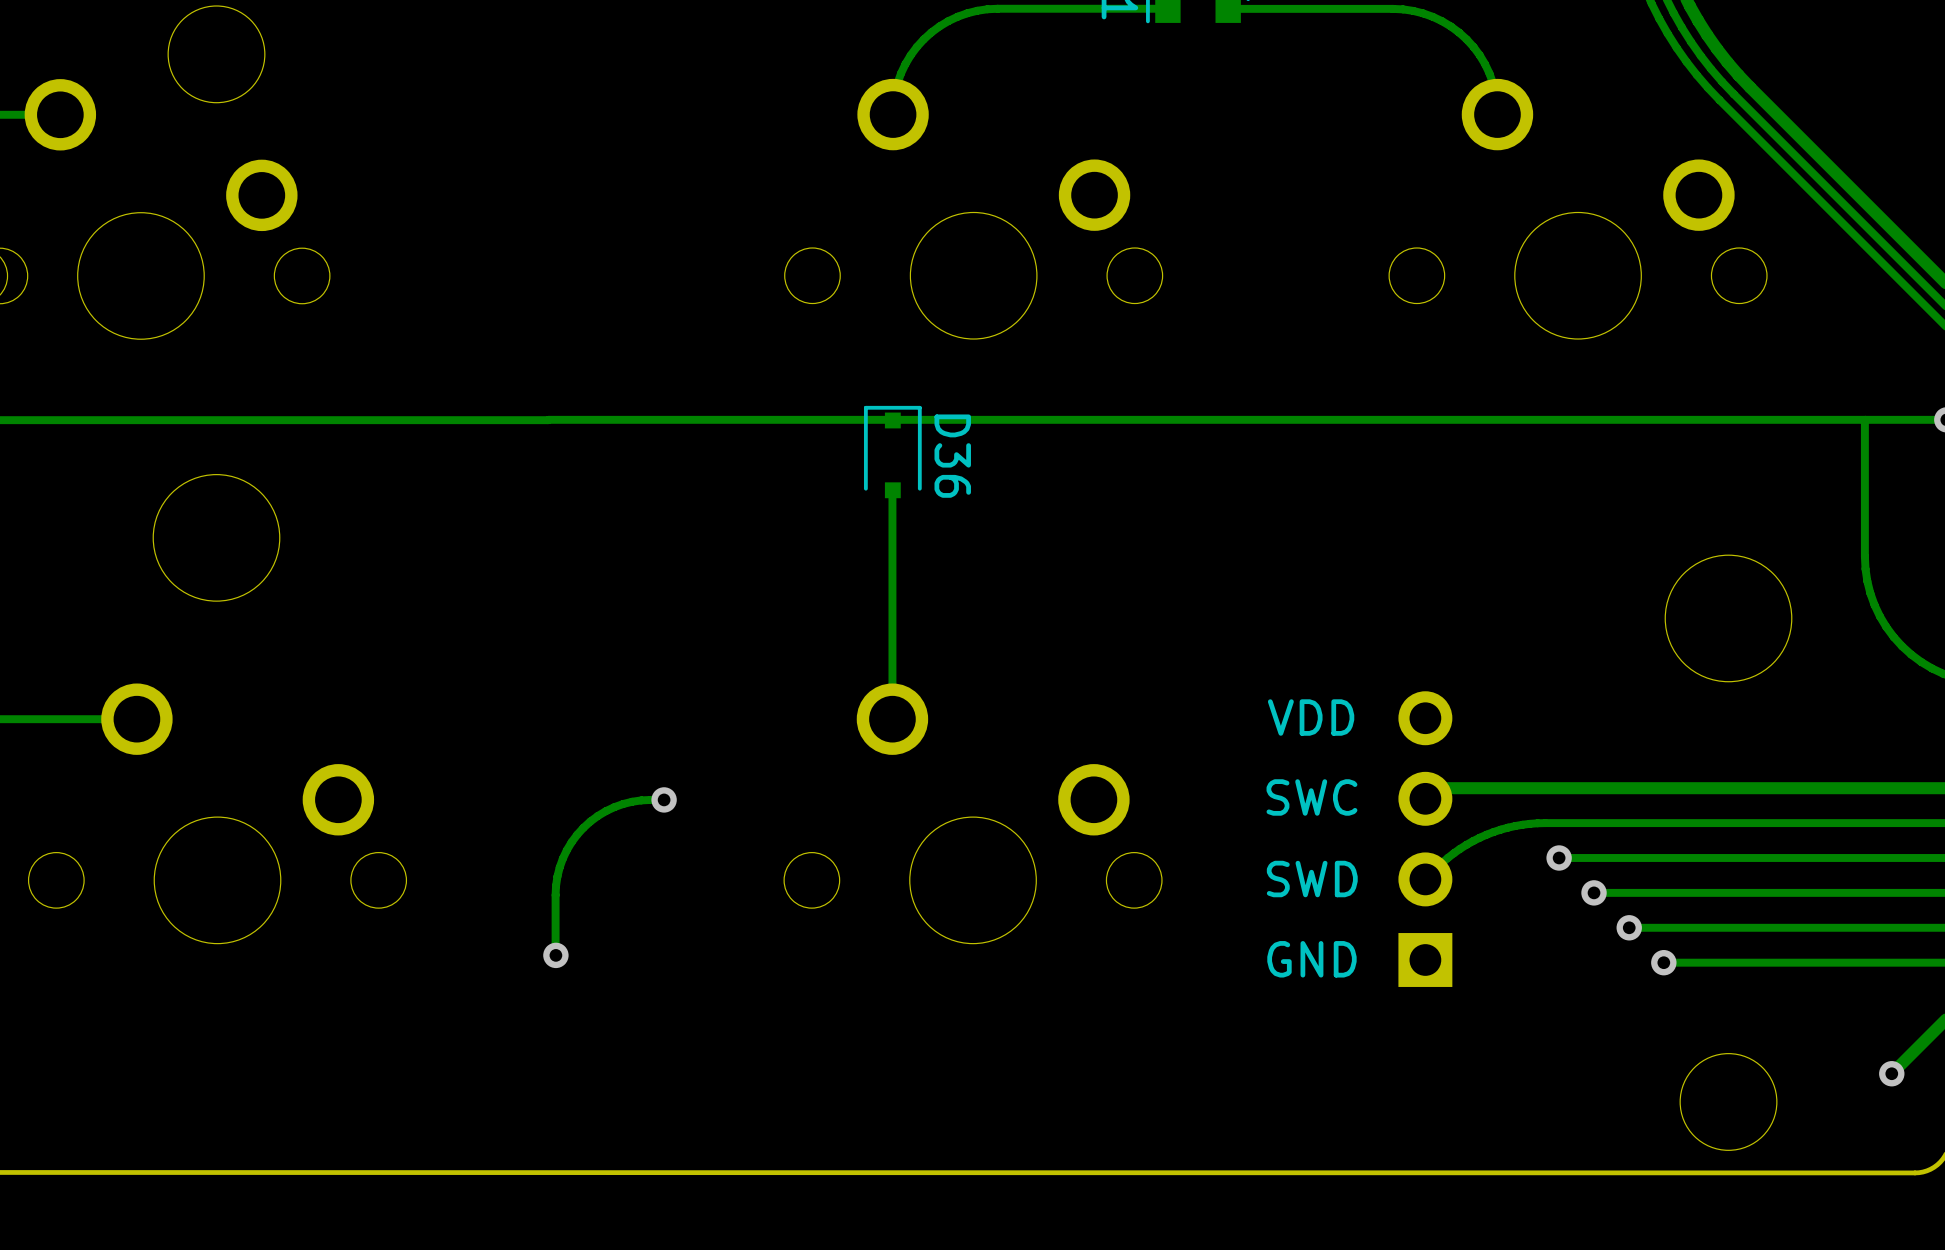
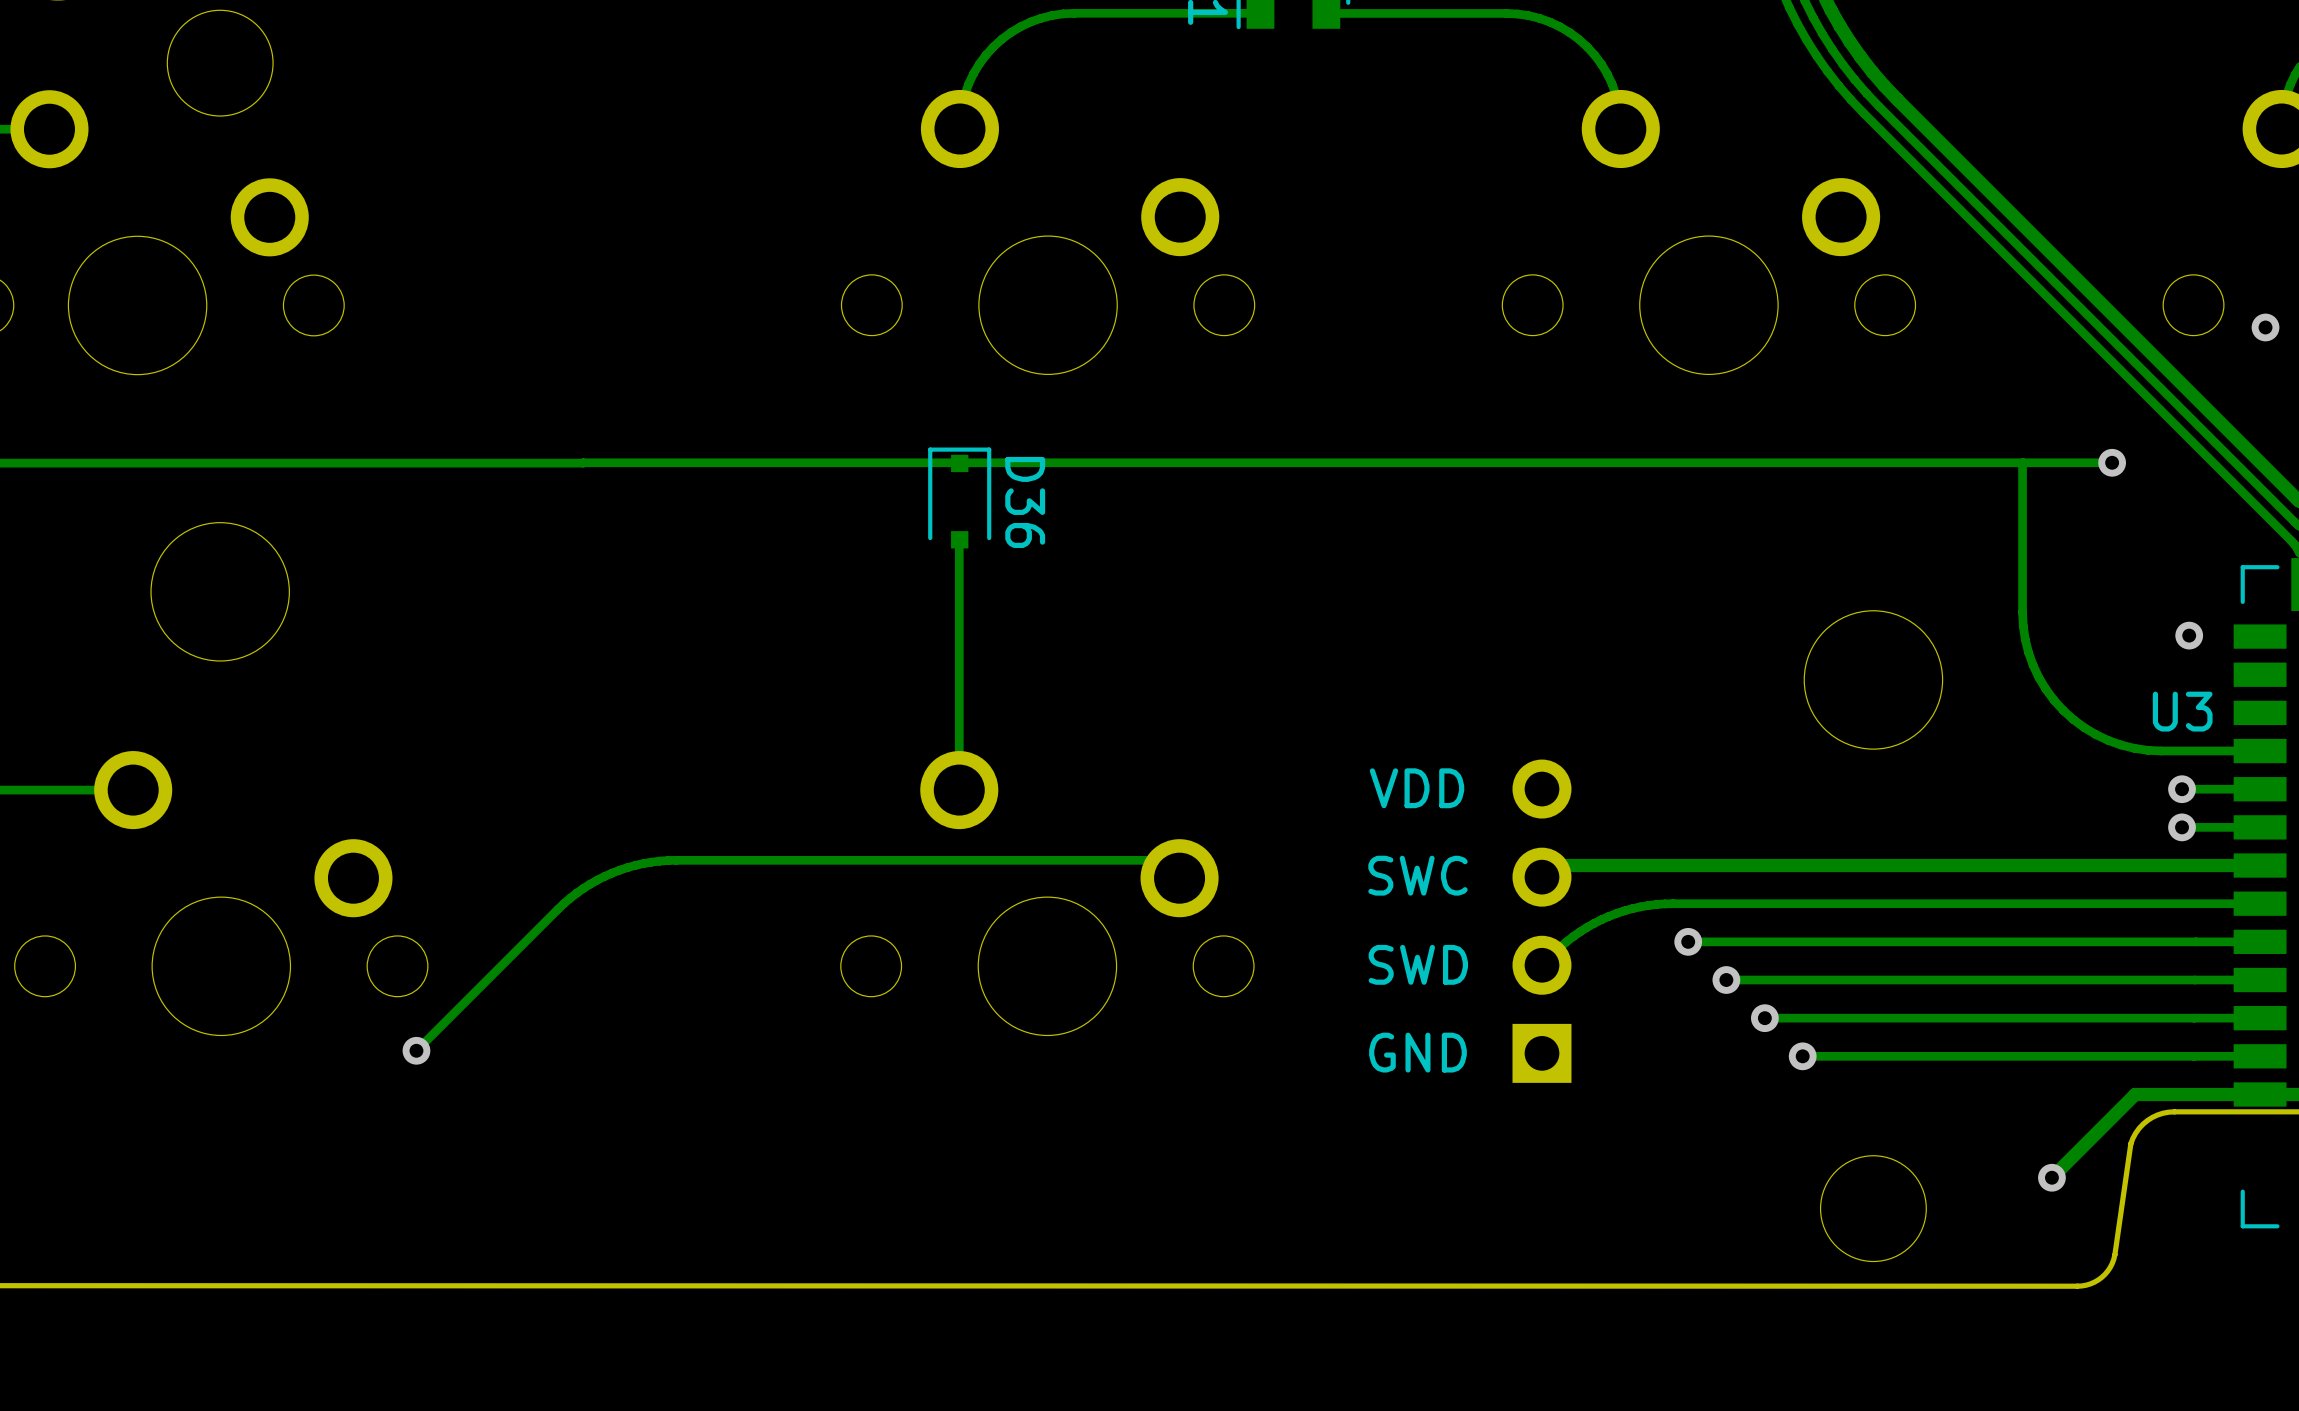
track: (664, 799) (641, 800) (614, 807) (590, 821) (571, 842) (559, 867) (556, 885) (555, 955) -> none
via: (664, 799) -> none
track: none -> (1179, 877) (1161, 860) (676, 860) (635, 865) (604, 876) (570, 898) (416, 1050)
via: (555, 955) -> none
via: none -> (416, 1050)

